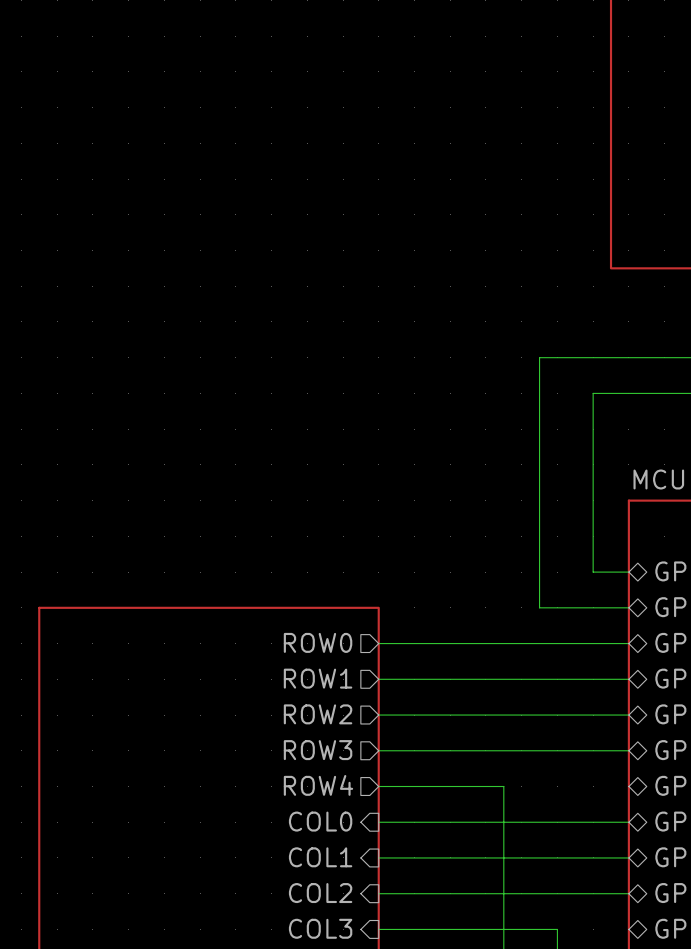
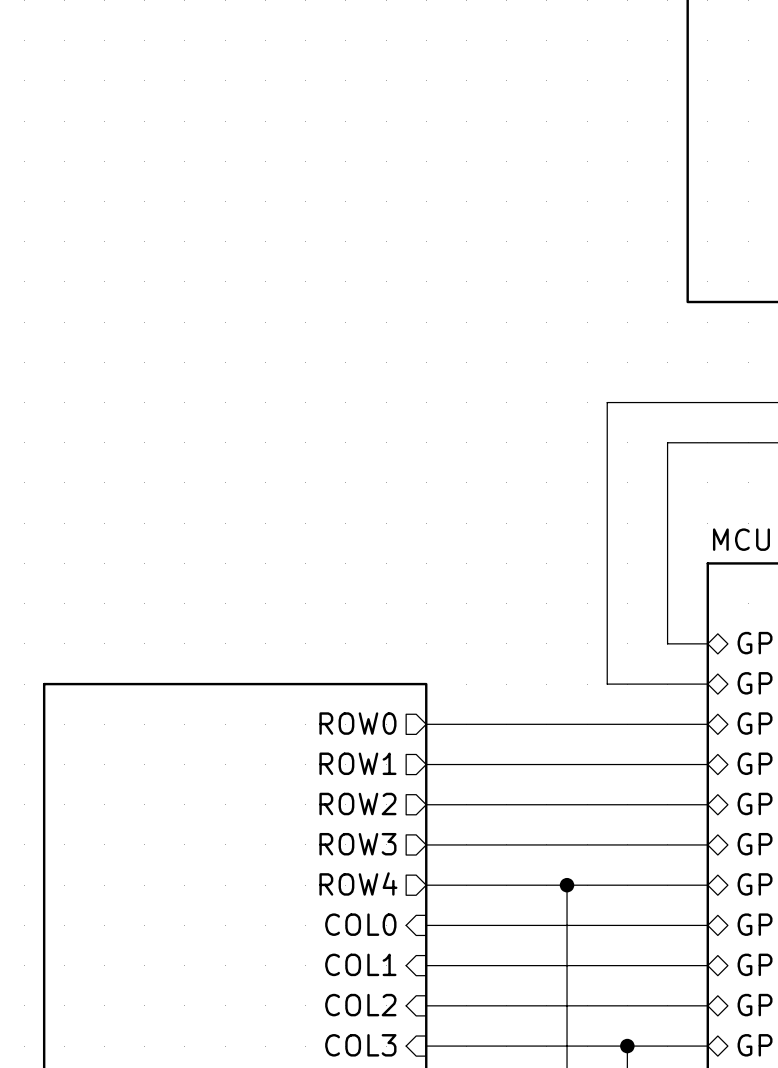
wire: none -> (567, 885) (707, 885)
junction: none -> (567, 885)
wire: none -> (627, 1046) (707, 1046)
junction: none -> (627, 1046)

